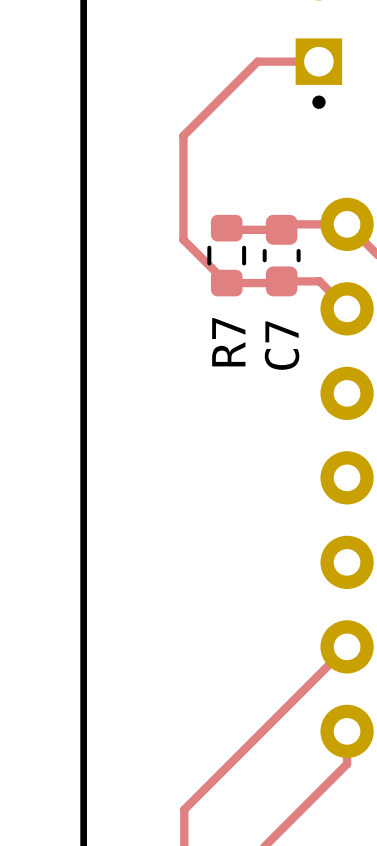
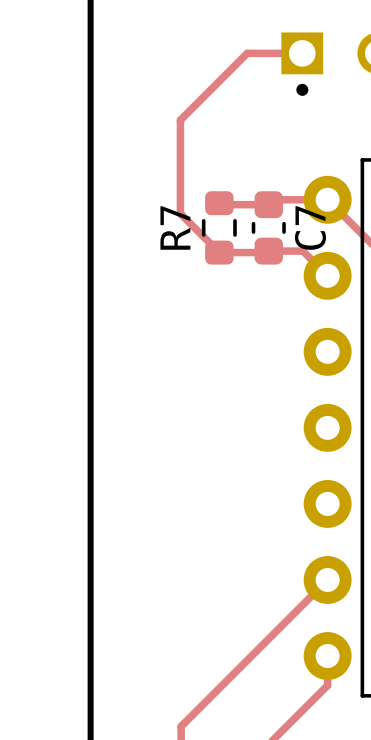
R7 name position: R7 (228, 342) -> R7 (175, 227)
C7 name position: C7 (282, 345) -> C7 (310, 228)

